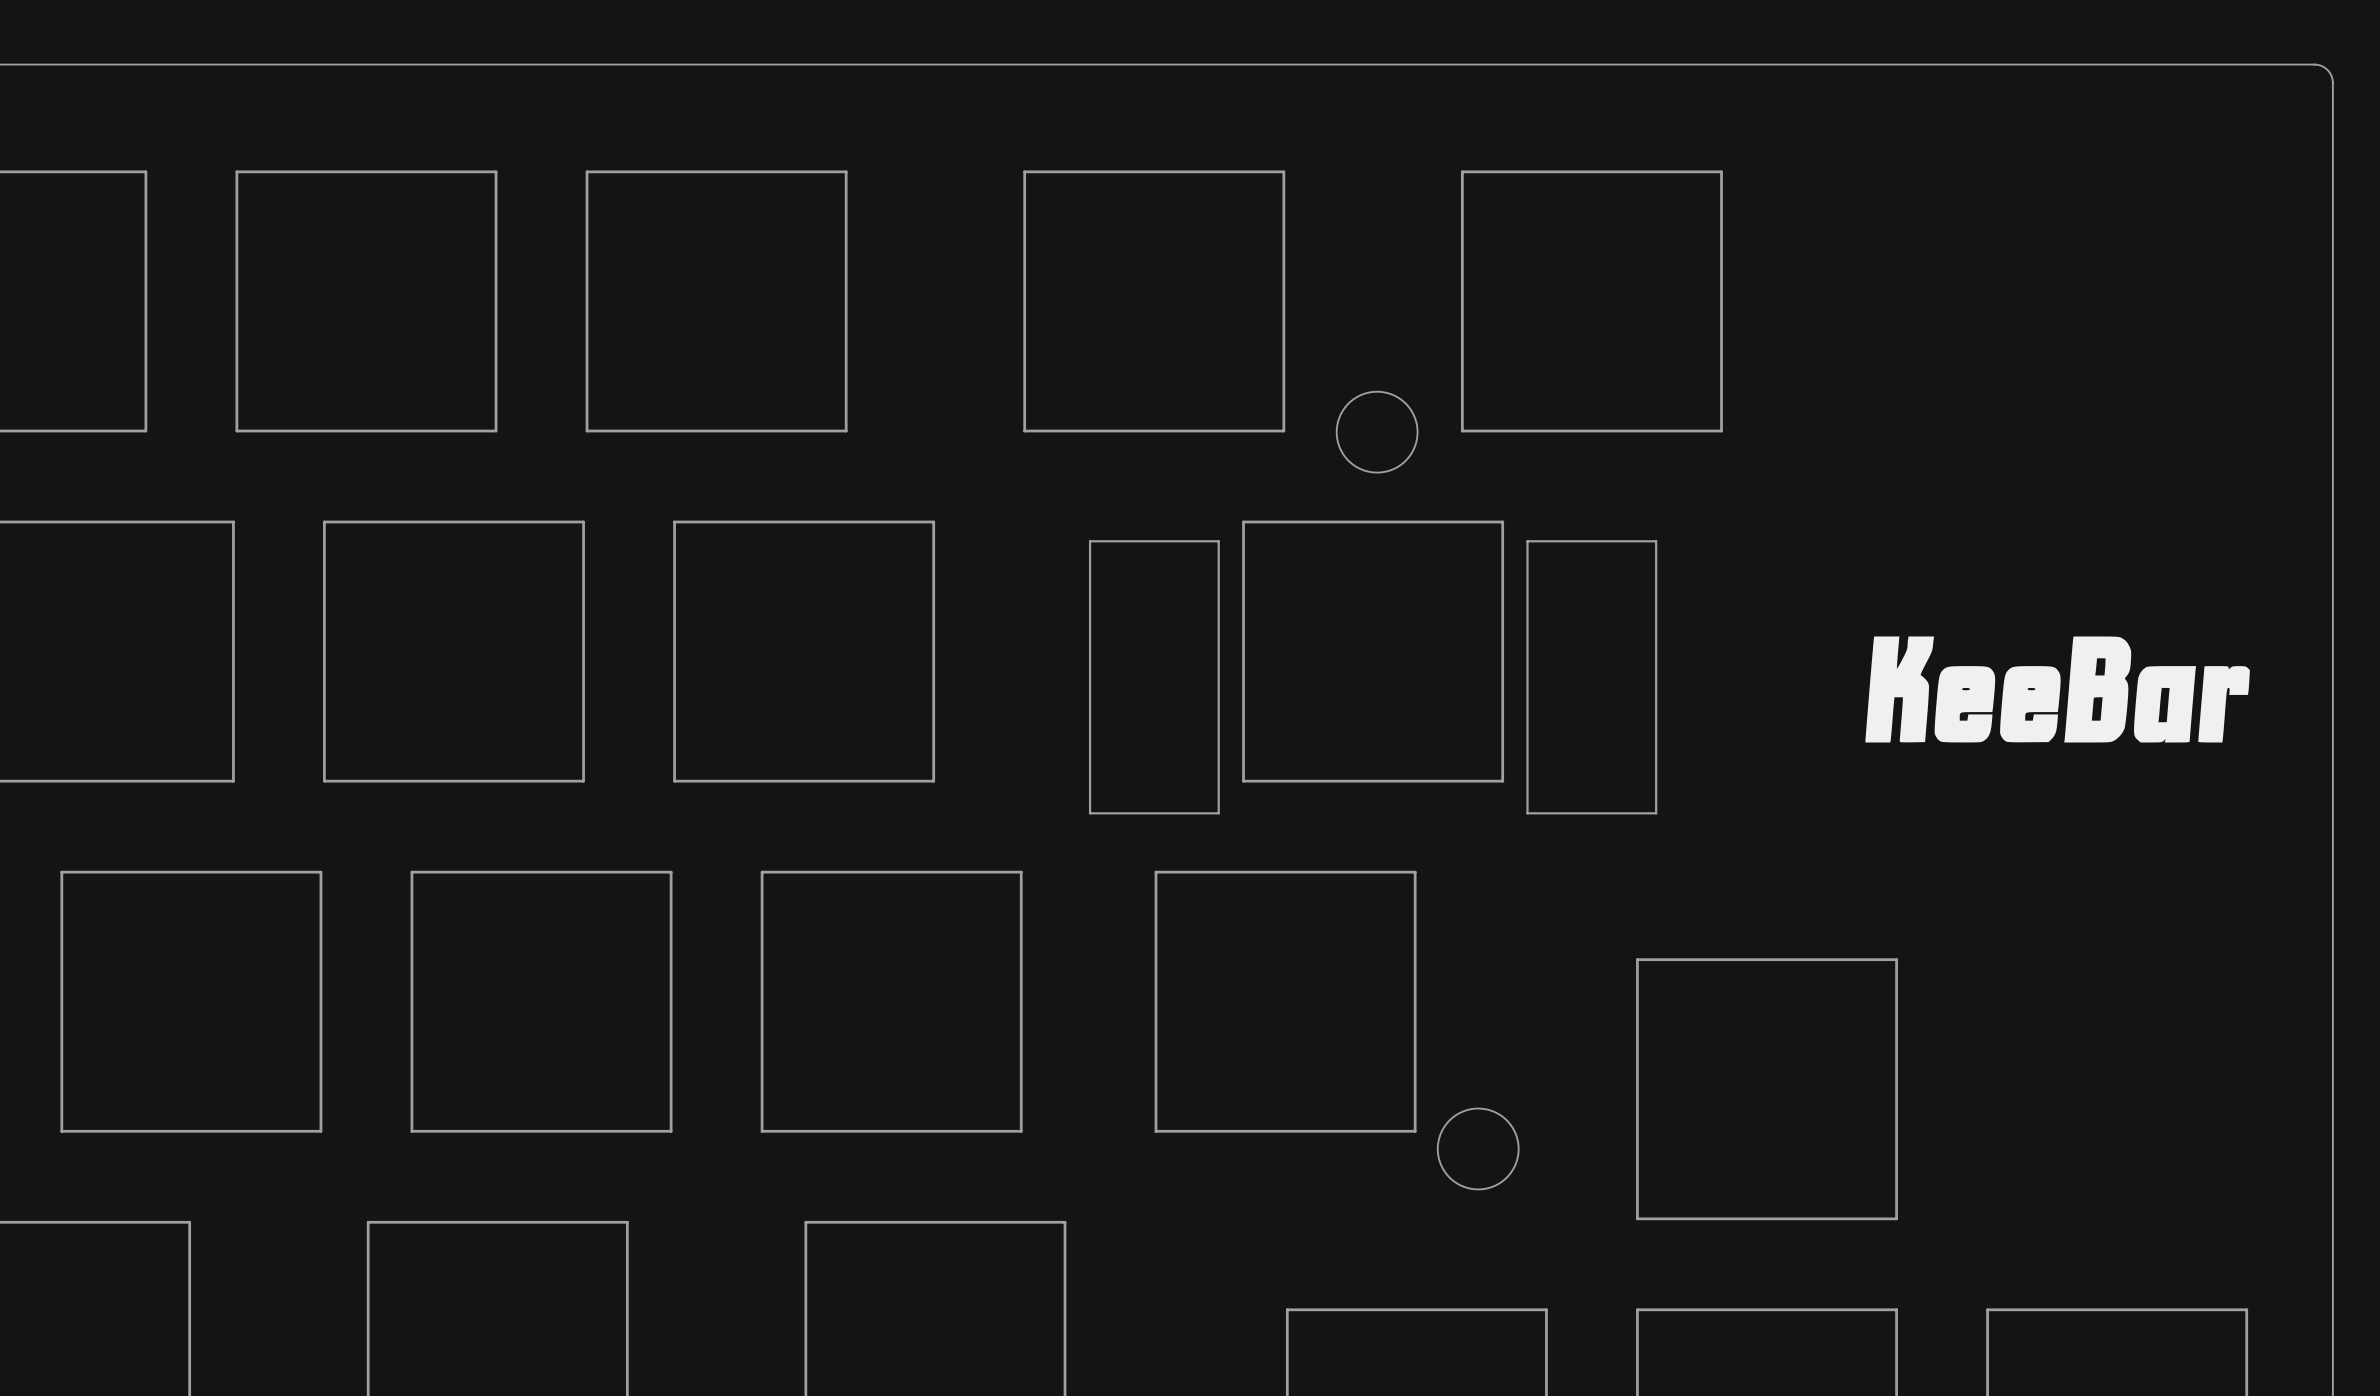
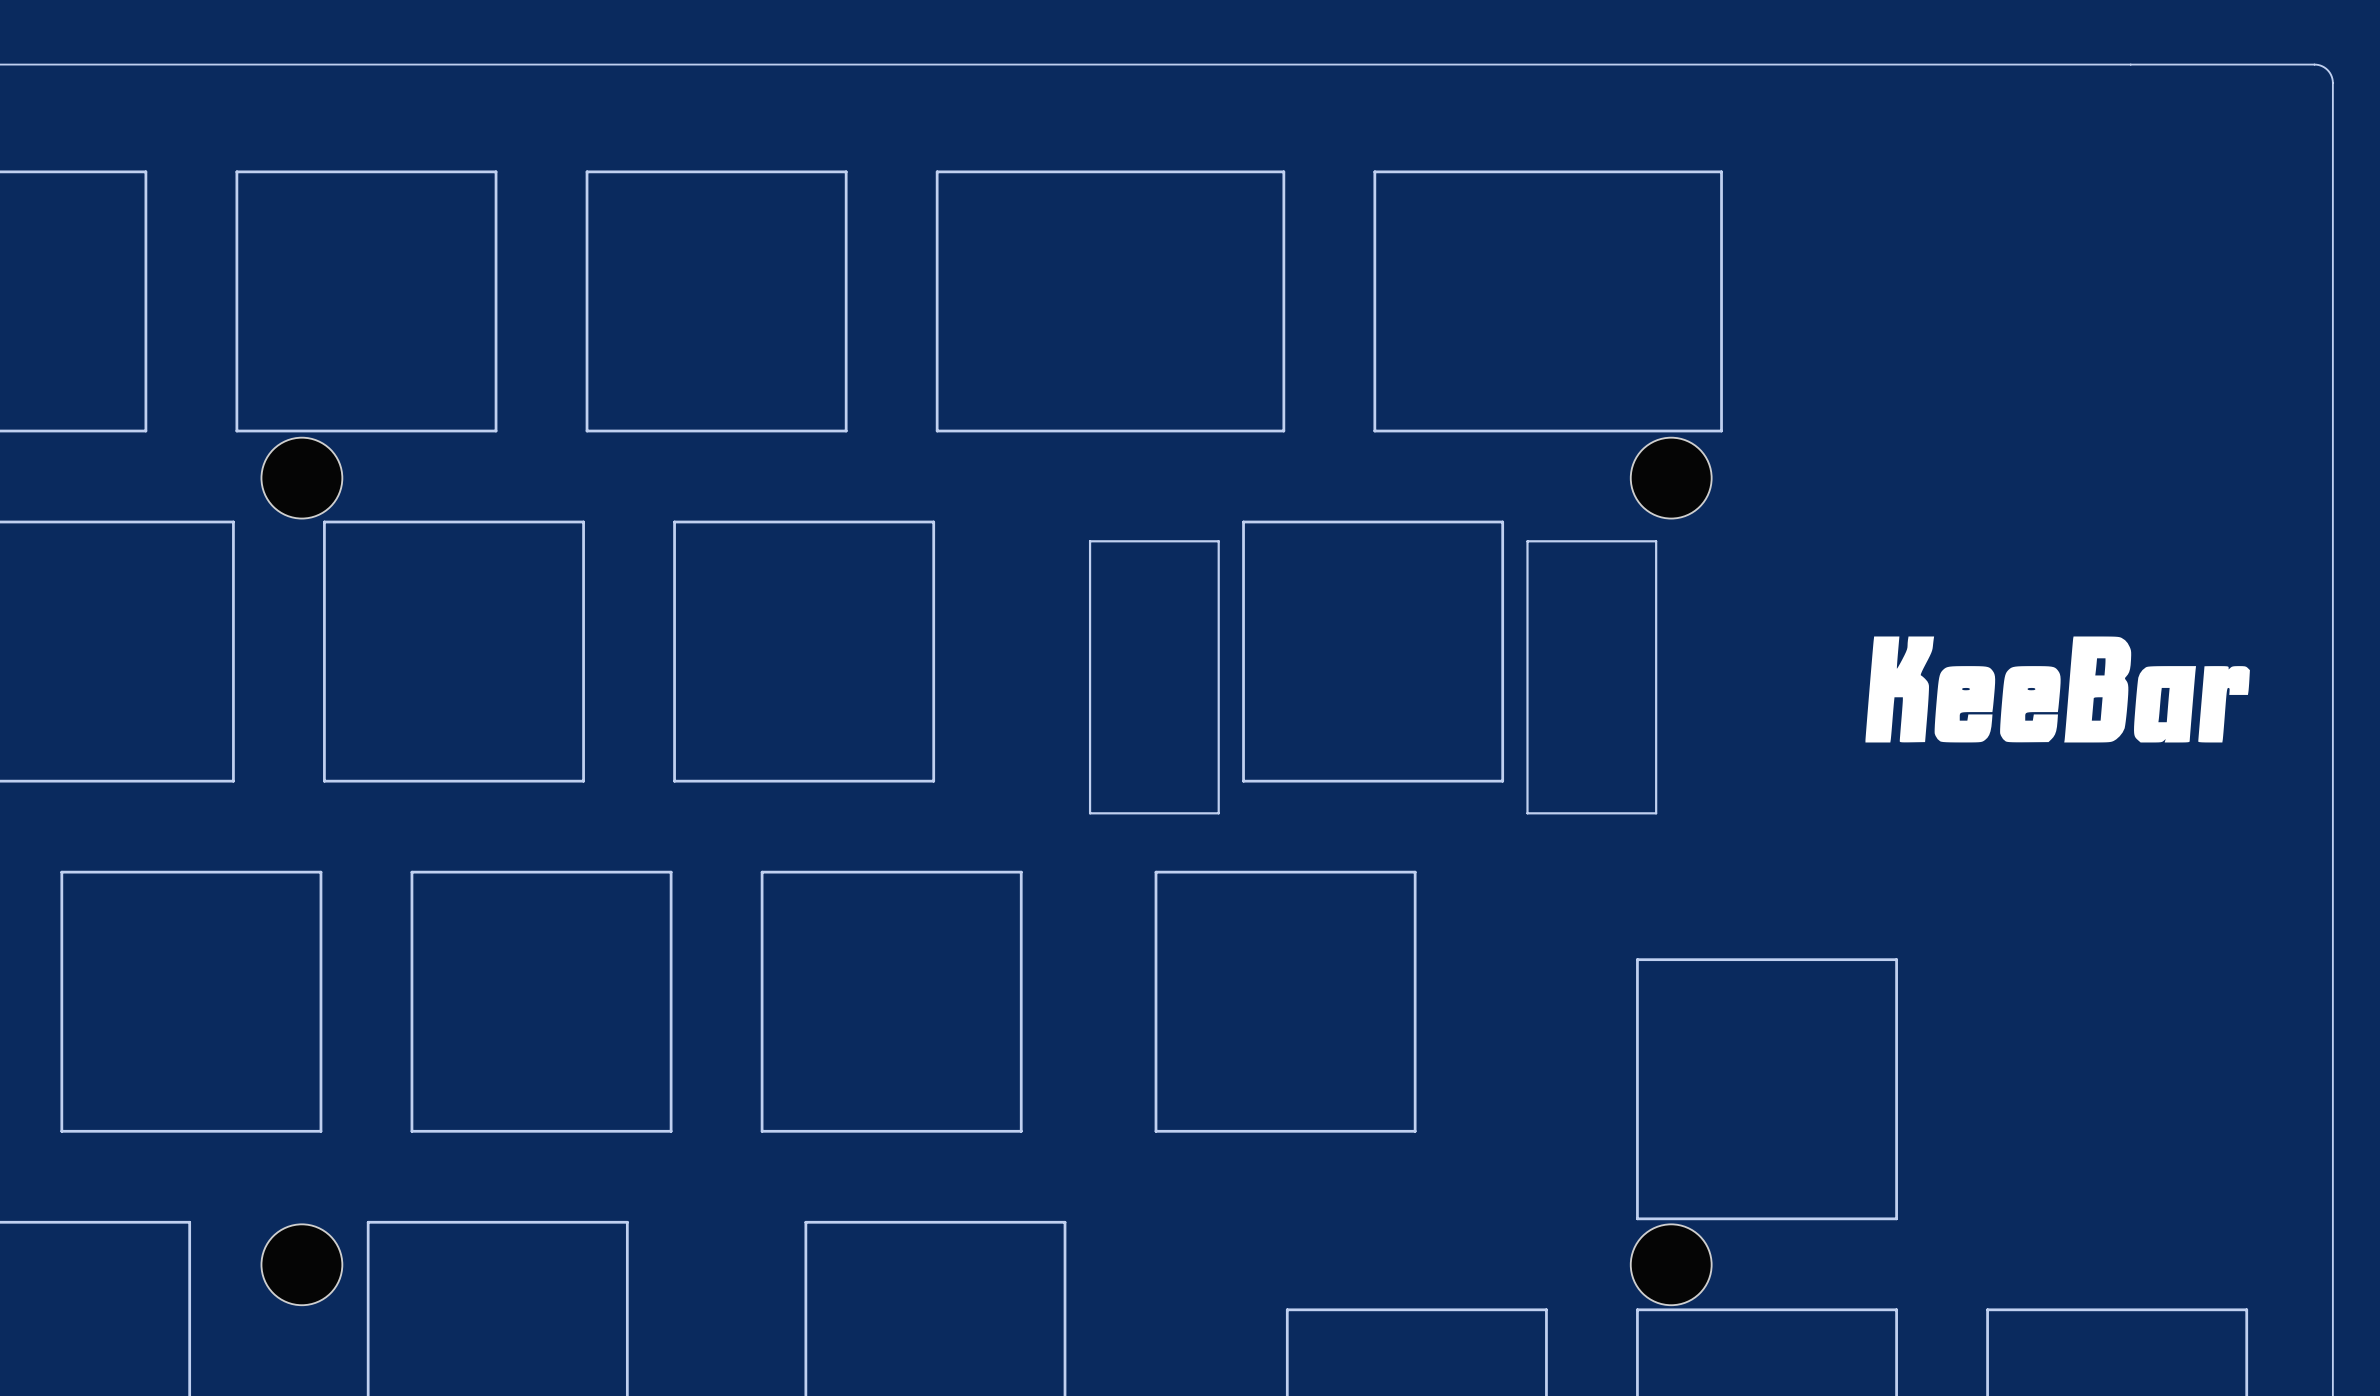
drawing: none -> [935, 170, 1723, 433]
drawing: [1023, 170, 1286, 433] -> none
drawing: [1460, 170, 1723, 433] -> none
drawing: [1336, 391, 1418, 473] -> none
part: none -> (301, 478)
part: none -> (1671, 478)
drawing: [1437, 1108, 1519, 1190] -> none
part: none -> (301, 1264)
part: none -> (1671, 1264)

